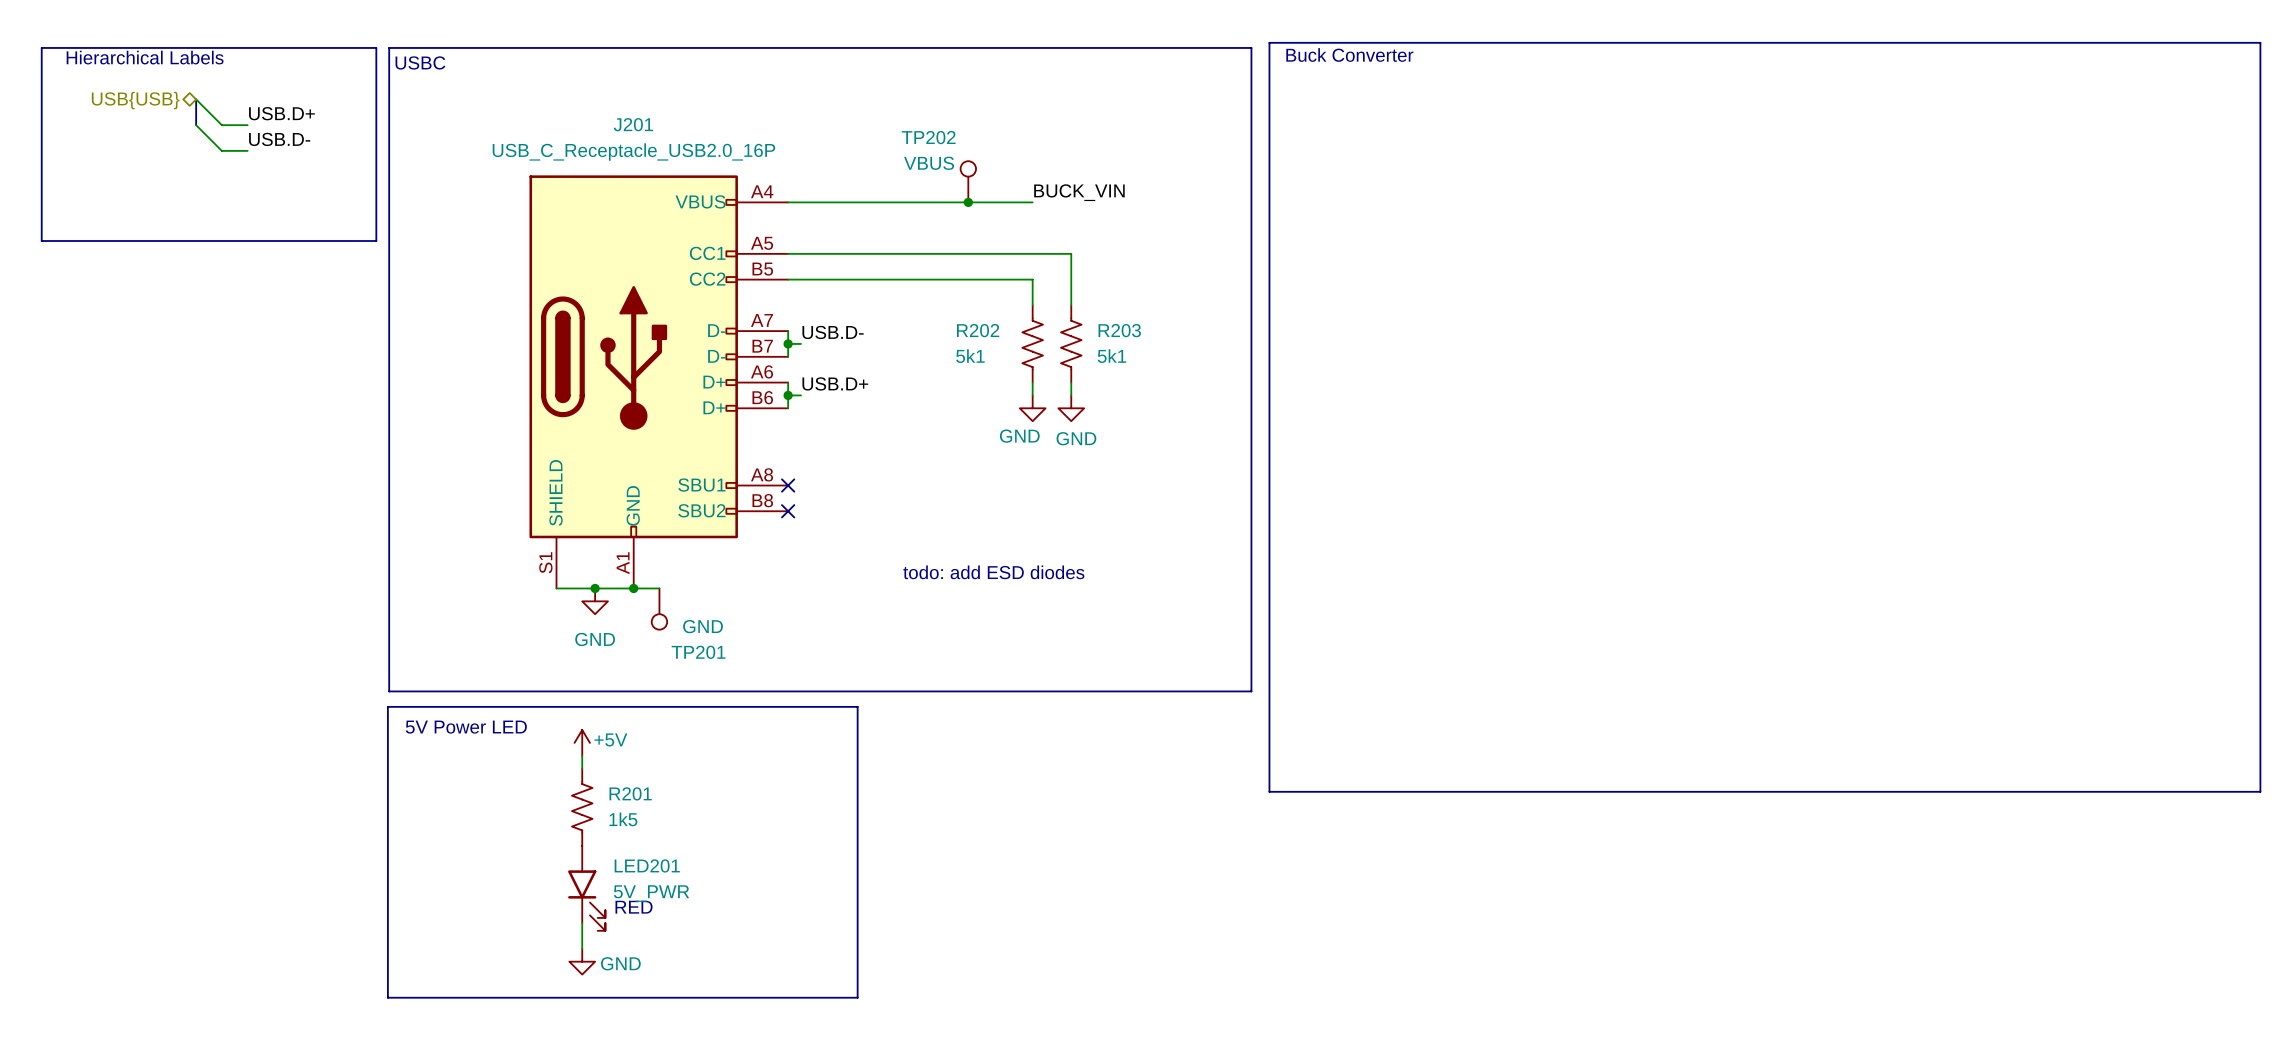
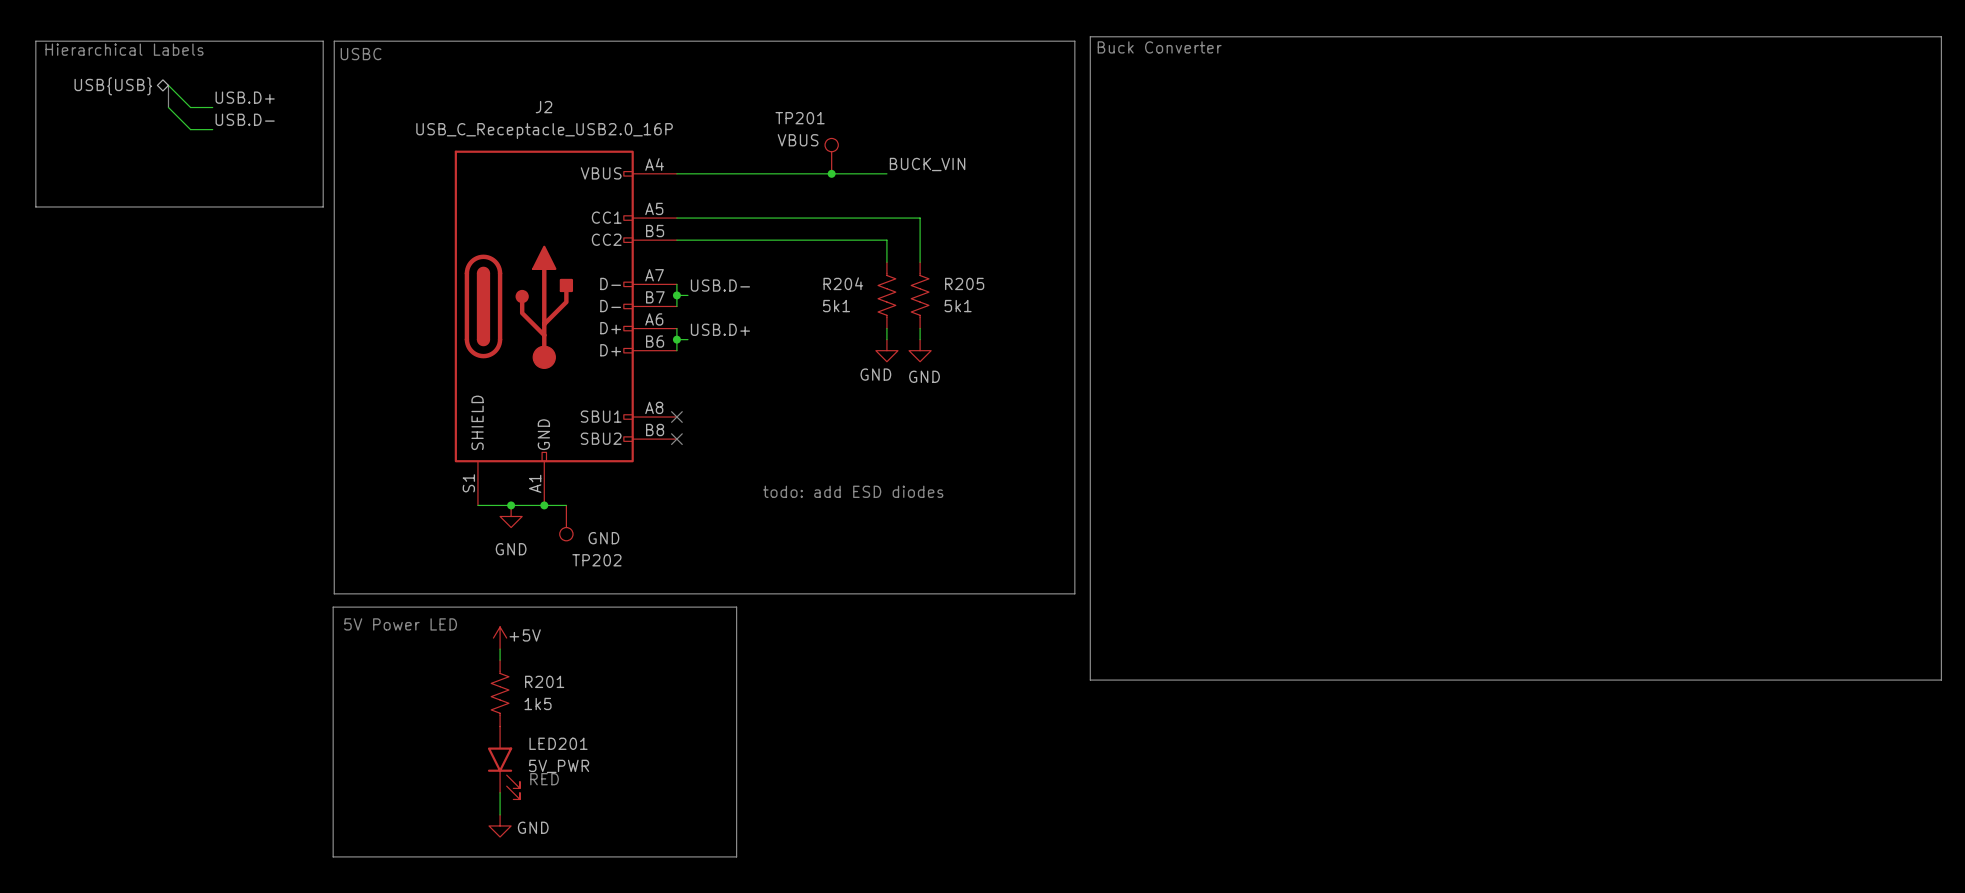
J201 name: J201 (633, 124) -> J2 (544, 107)
TP202 name: TP202 (928, 137) -> TP201 (800, 118)
R202 name: R202 (978, 330) -> R204 (843, 283)
R203 name: R203 (1119, 330) -> R205 (964, 283)
TP201 name: TP201 (698, 652) -> TP202 (596, 560)

